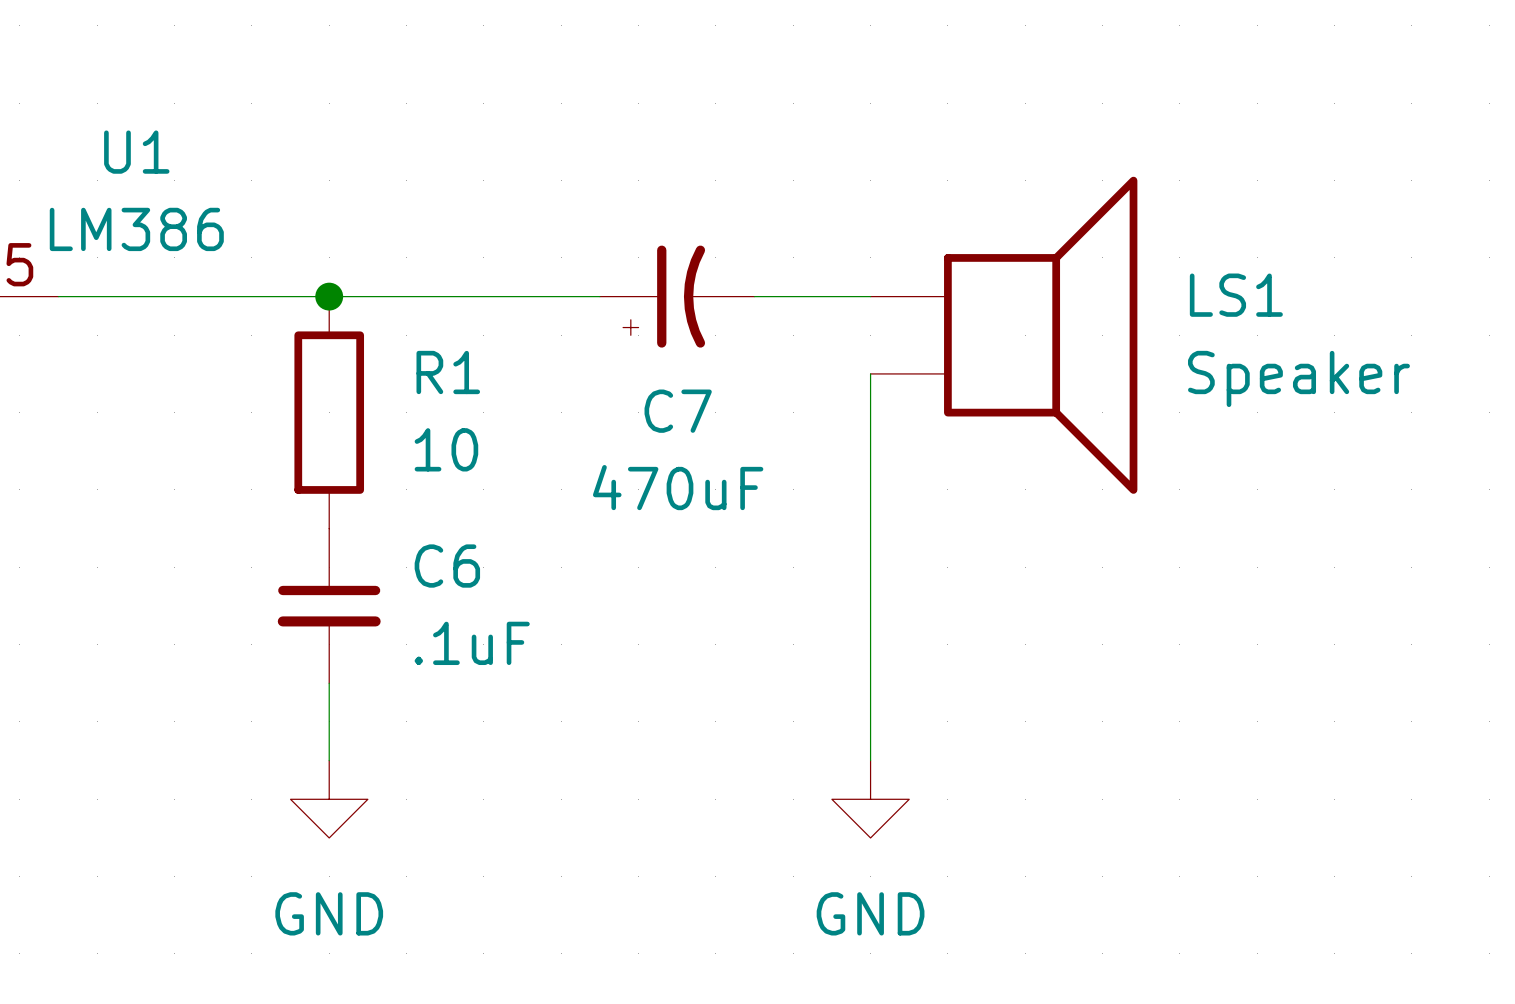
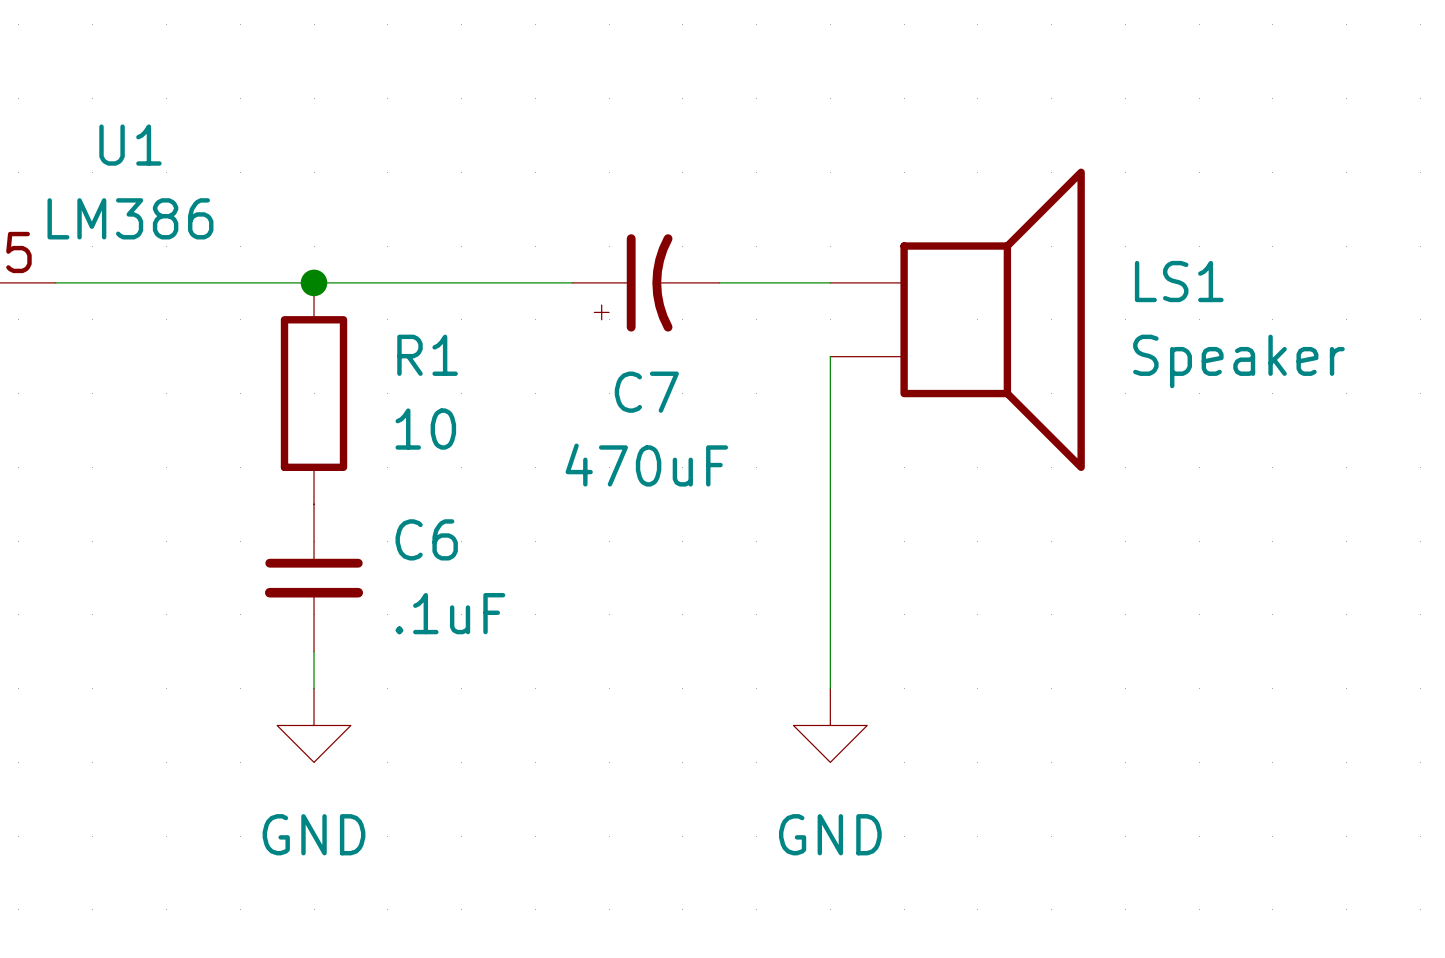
power symbol position: GND (329, 799) -> GND (314, 725)
power symbol position: GND (870, 799) -> GND (830, 725)

